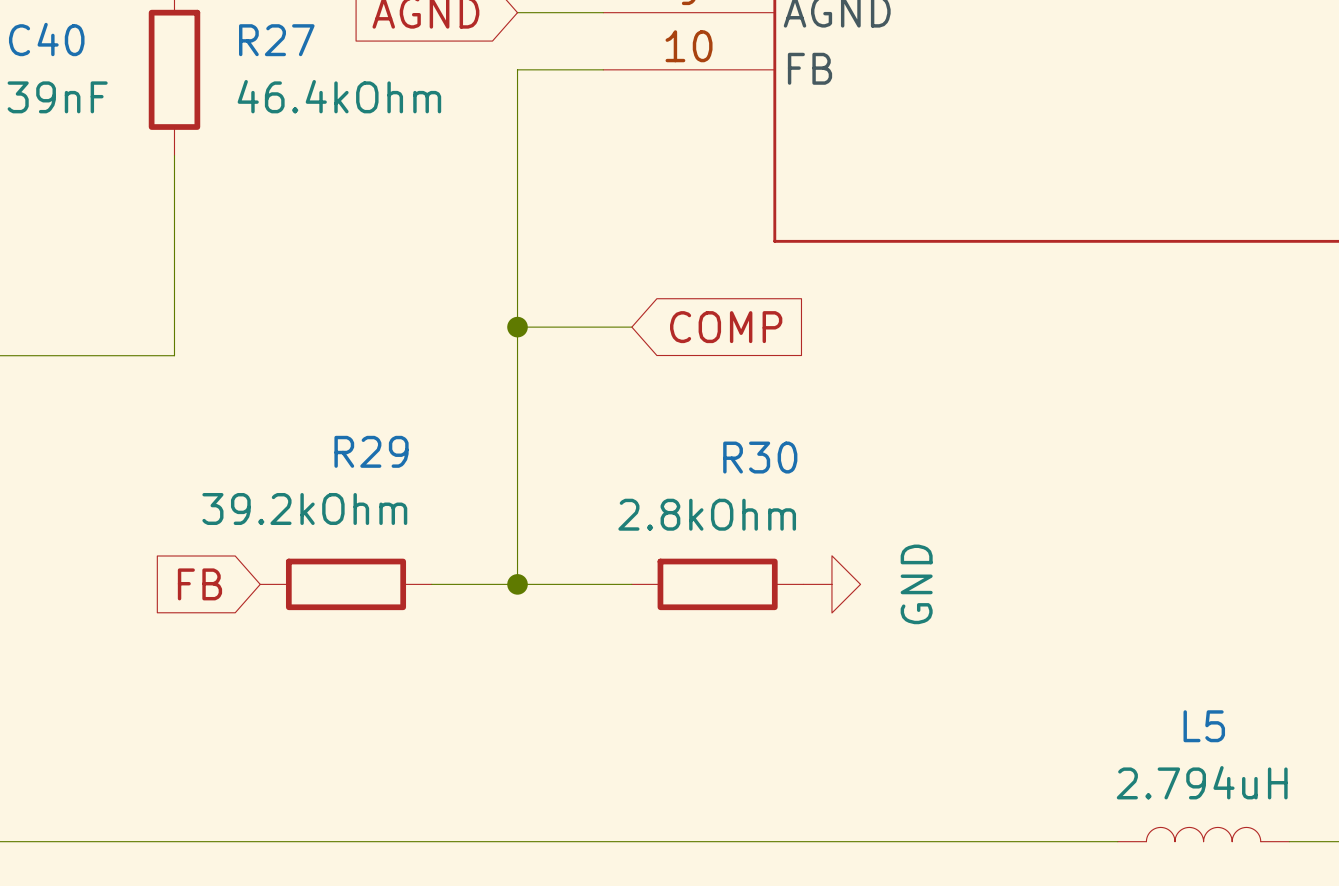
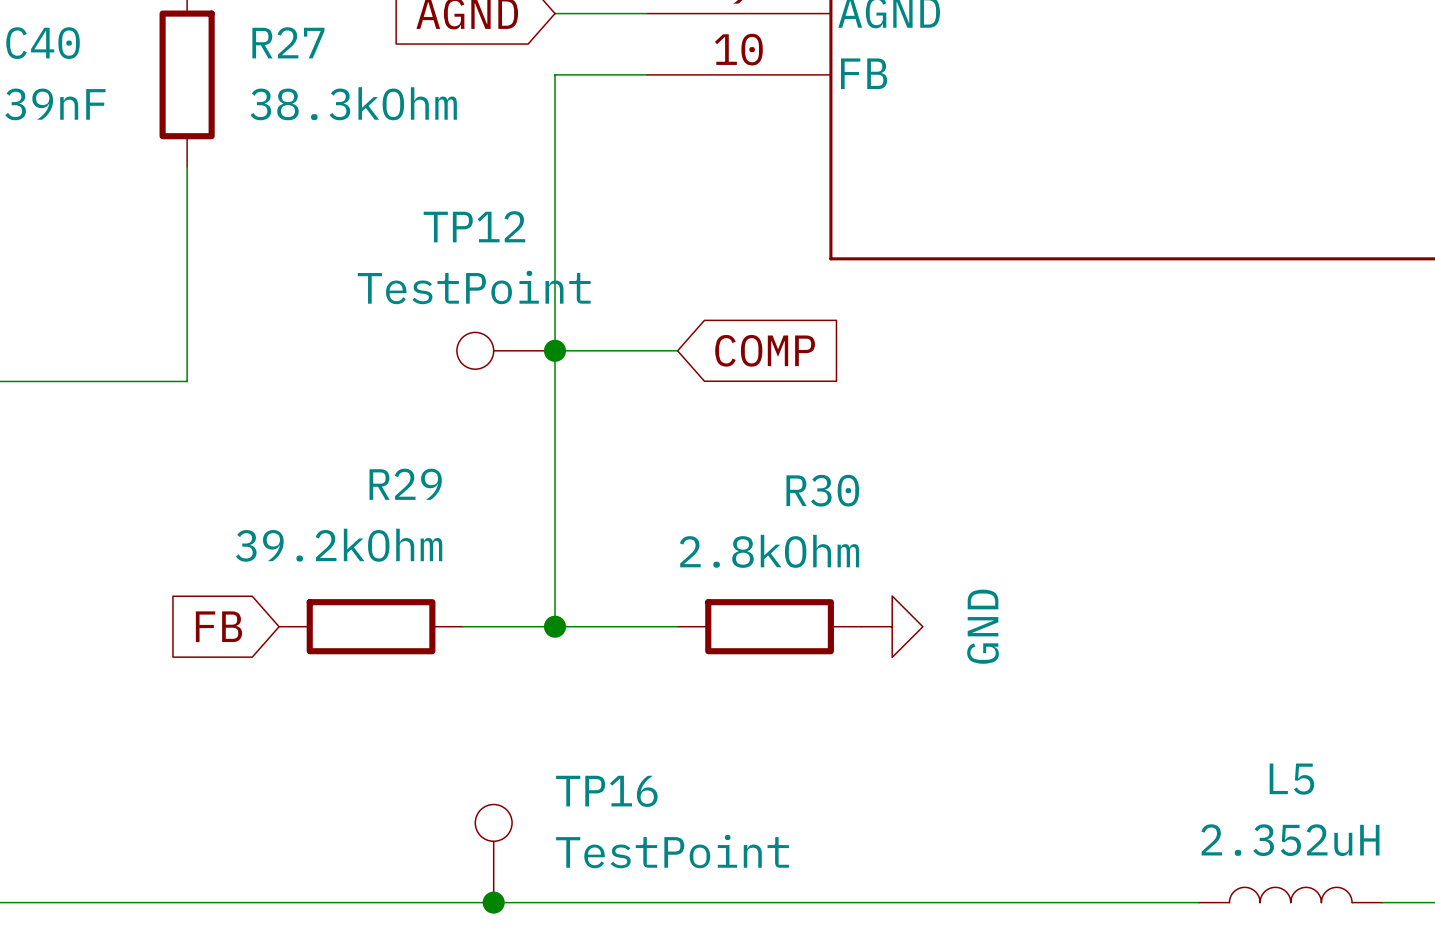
R27 value: 46.4kOhm (339, 96) -> 38.3kOhm (353, 103)
TP12: none -> TestPoint (505, 350)
L5 value: 2.794uH (1202, 782) -> 2.352uH (1290, 840)
TP16: none -> TestPoint (493, 853)
junction: none -> (493, 902)

